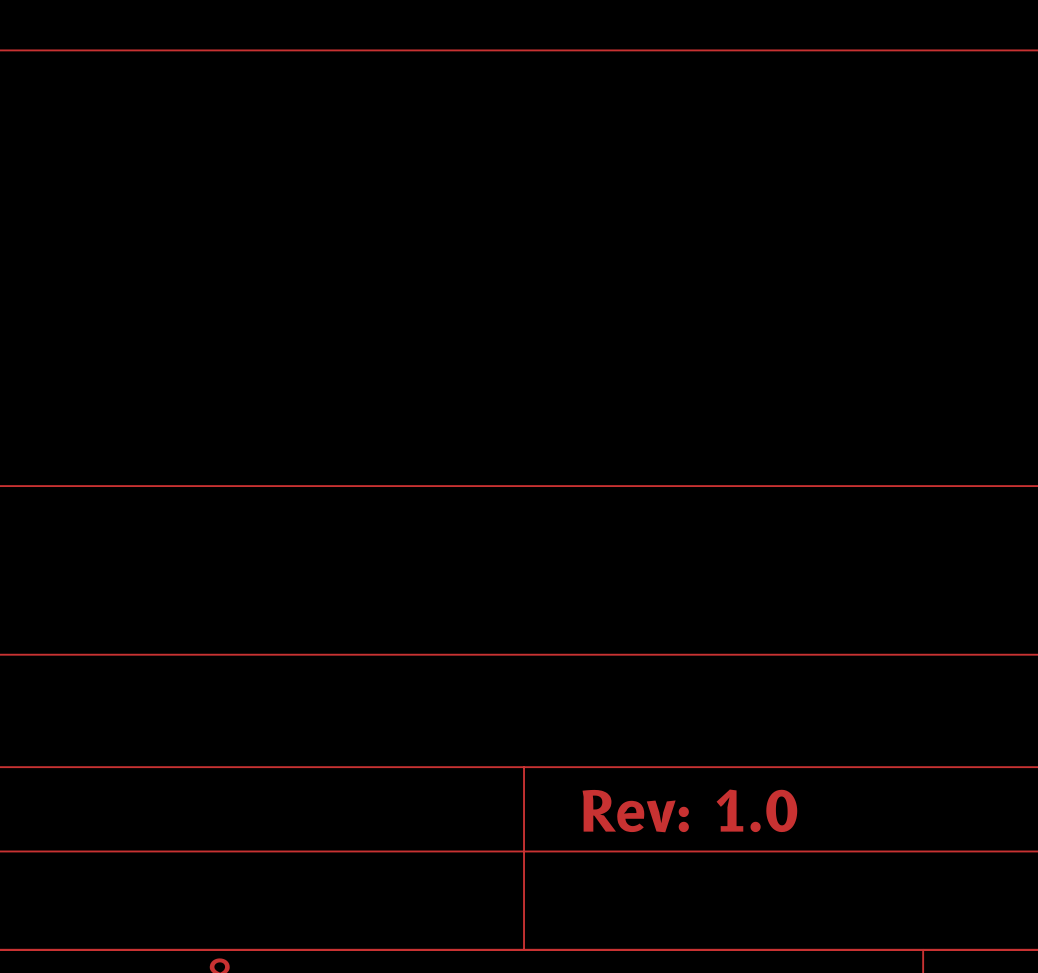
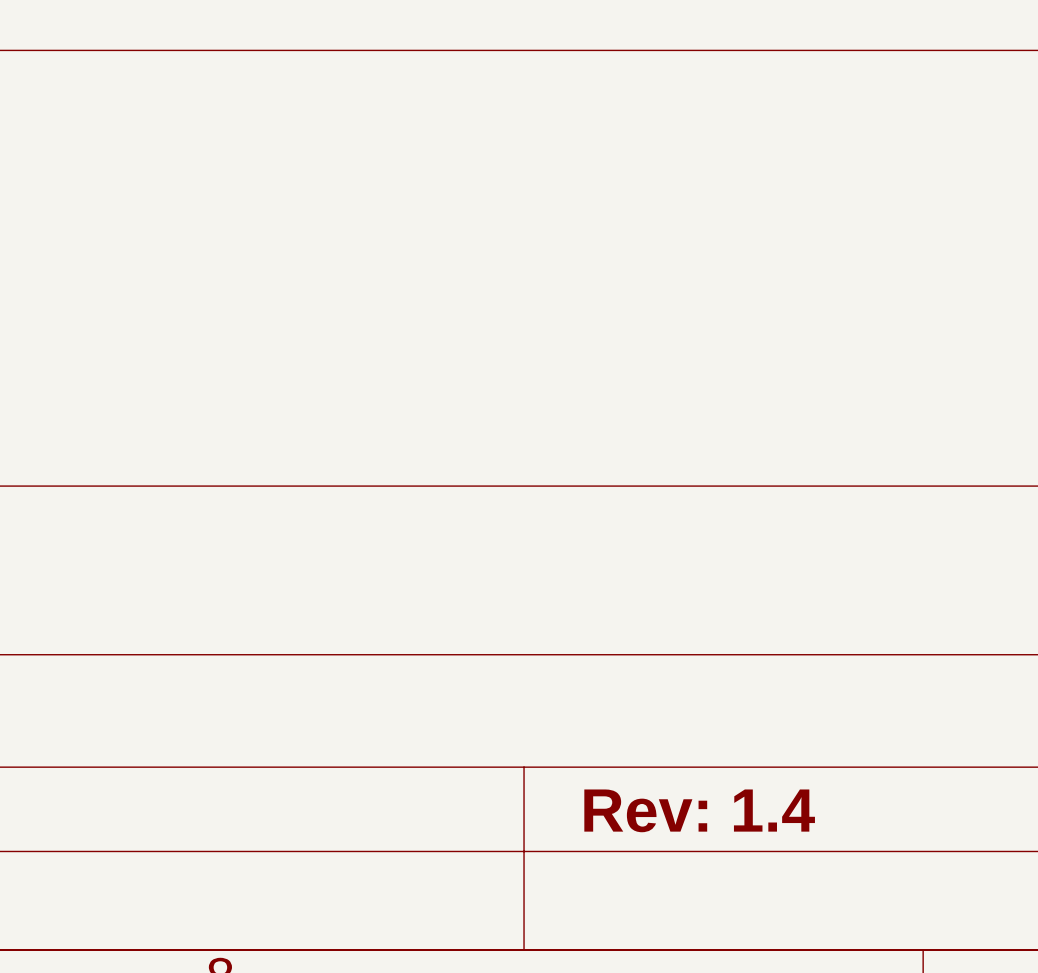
title block: Rev: 1.0 (689, 810) -> Rev: 1.4 (699, 810)

